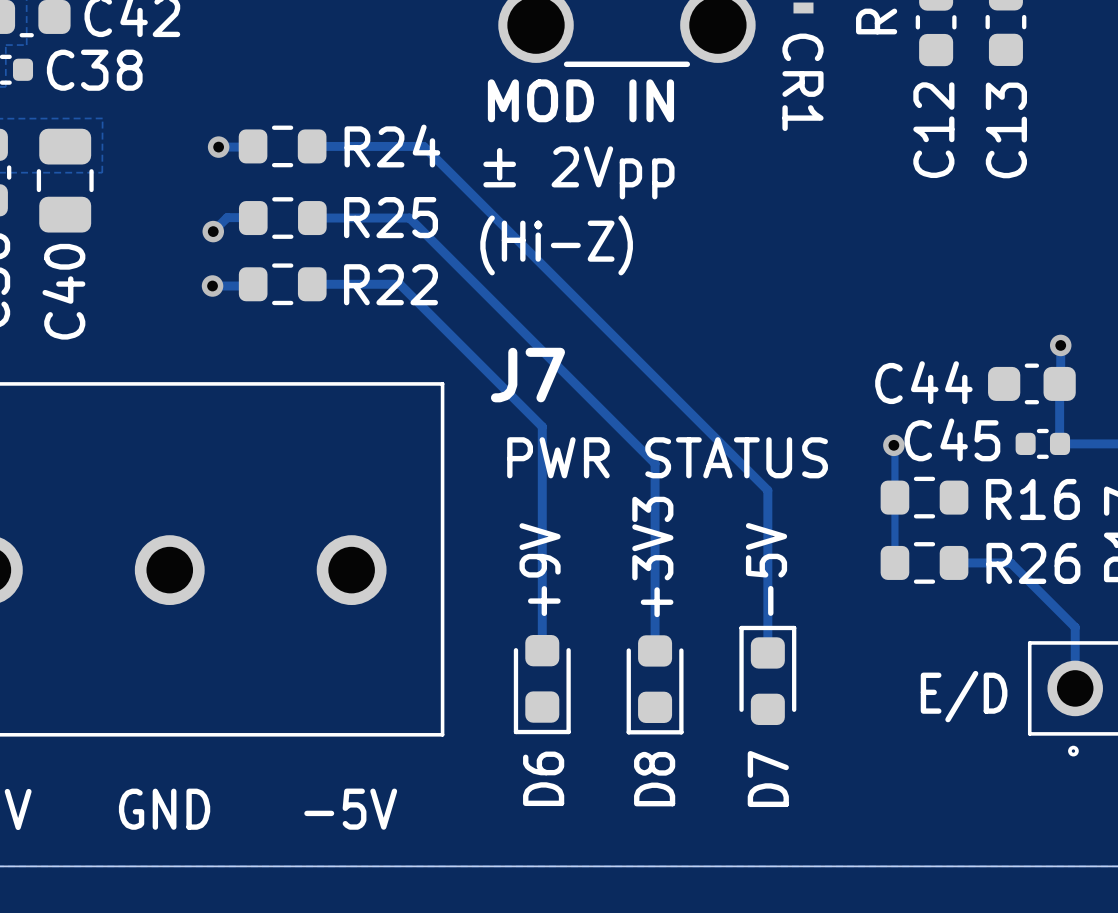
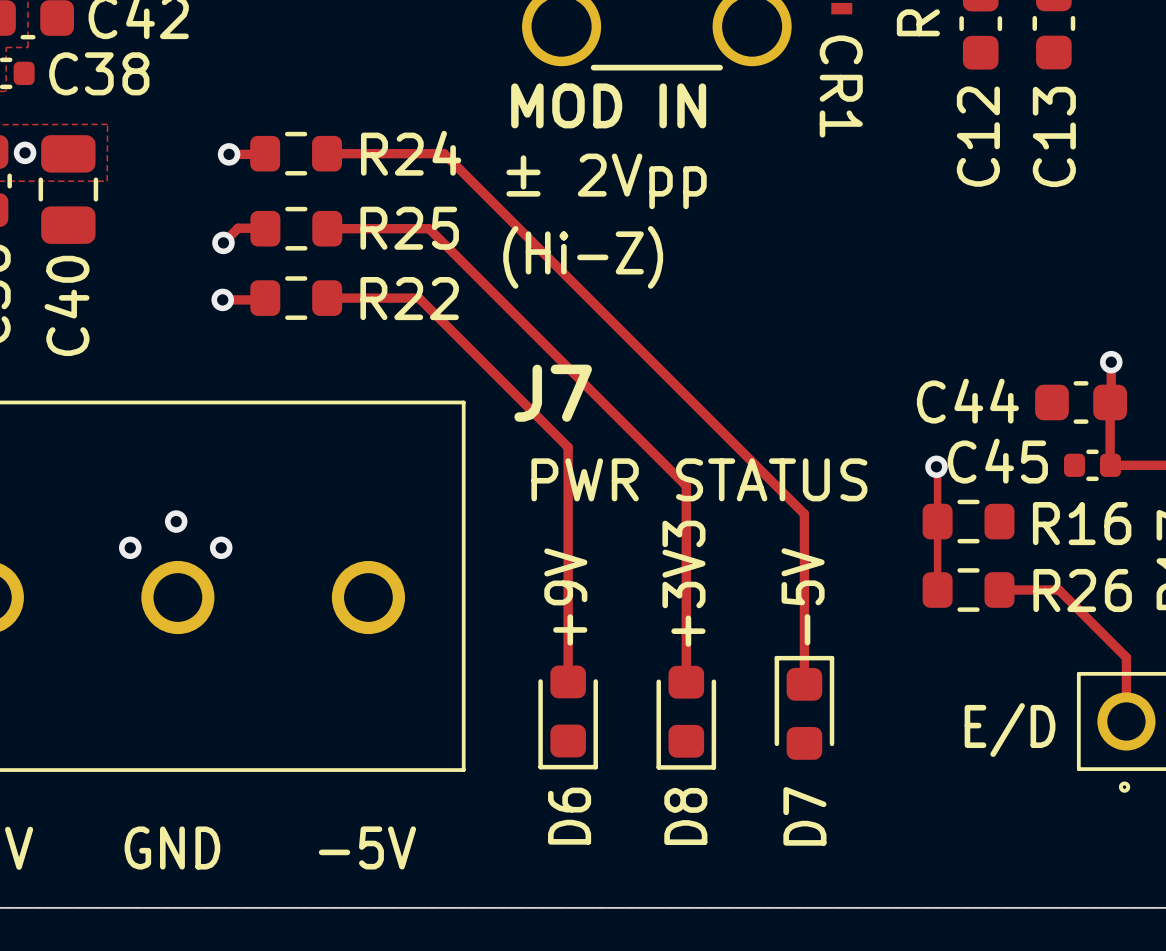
via: none -> (25, 152)
via: none -> (176, 521)
via: none -> (130, 547)
via: none -> (221, 547)

